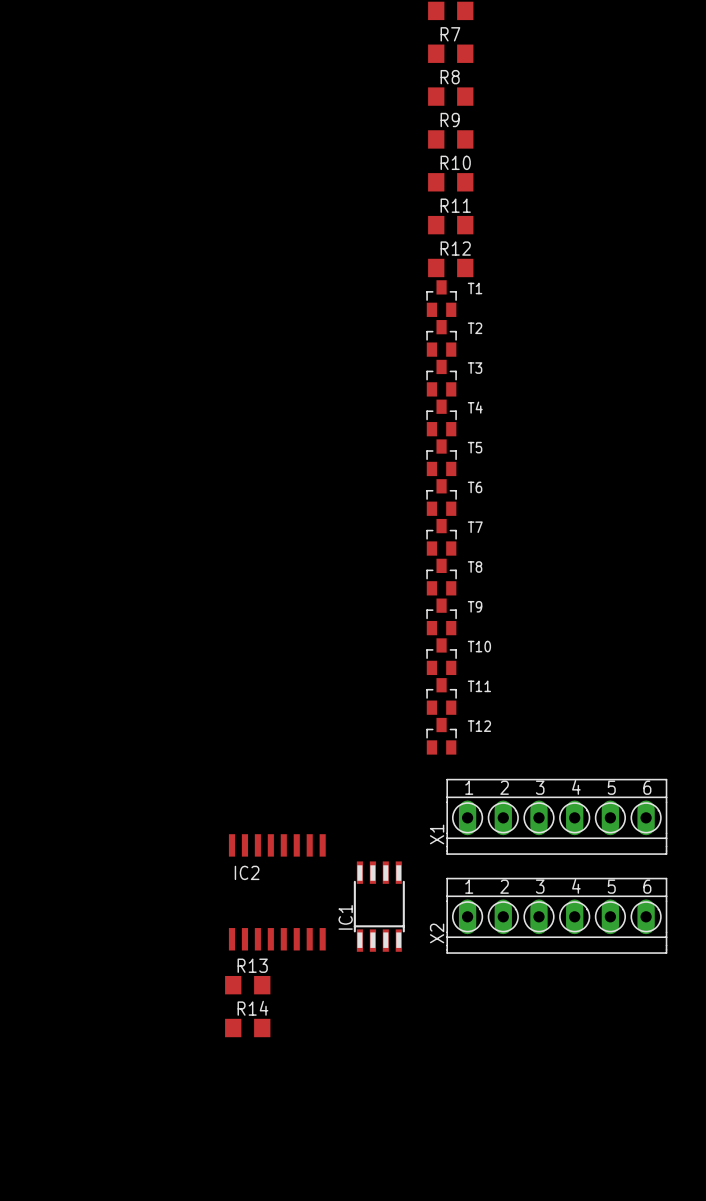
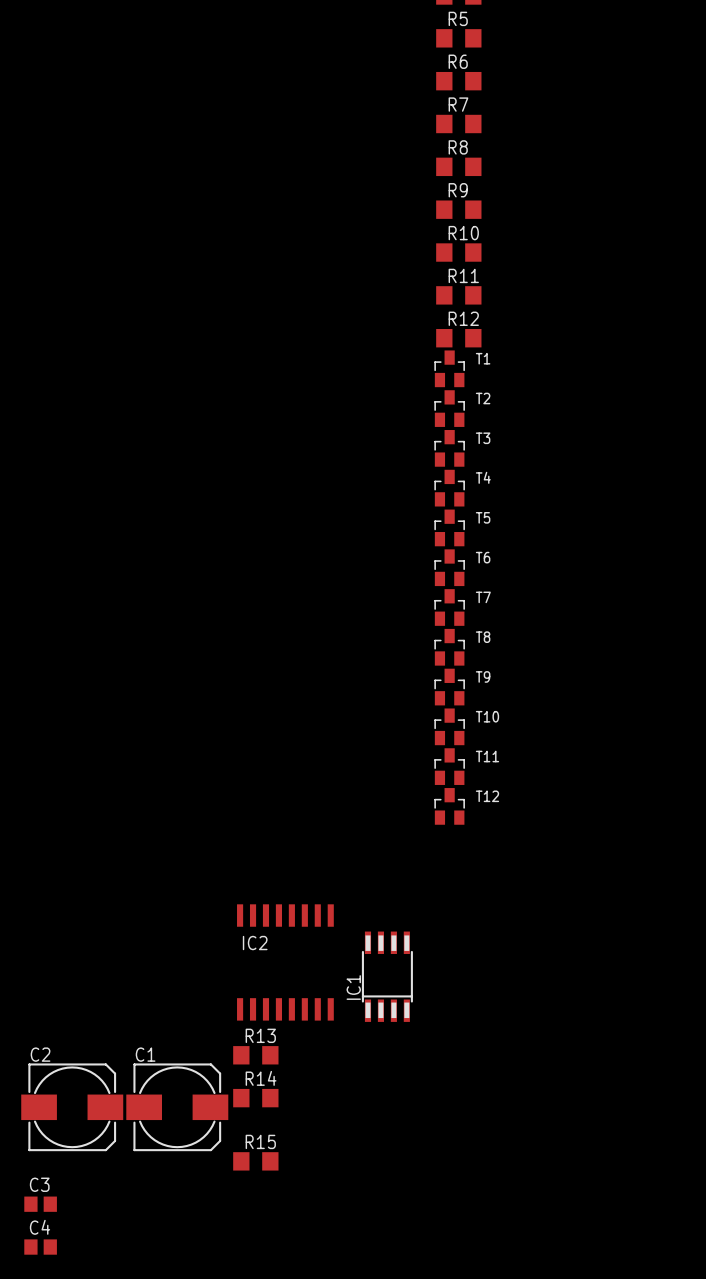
X1: (556, 816) -> none
X2: (556, 915) -> none
C2: none -> (72, 1107)
C1: none -> (177, 1107)
R15: none -> (255, 1161)
C3: none -> (40, 1204)
C4: none -> (40, 1247)

